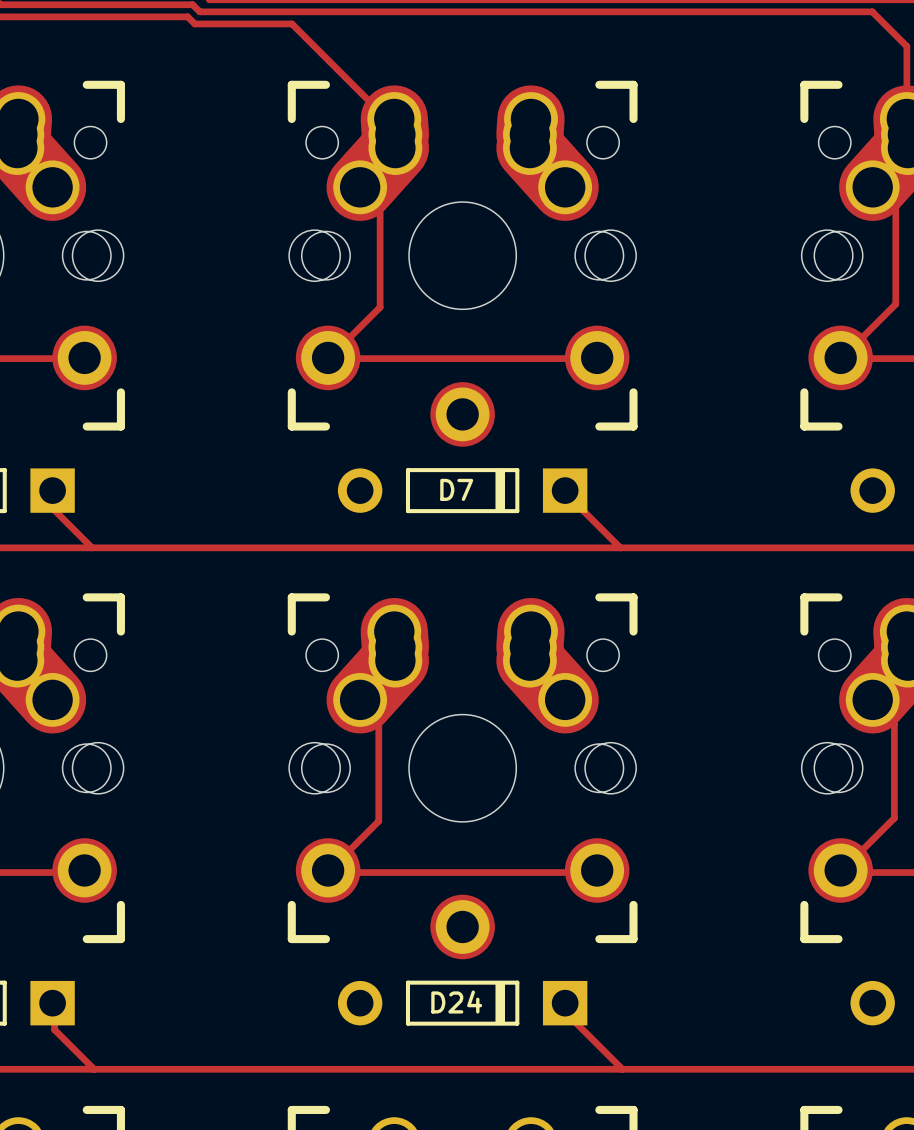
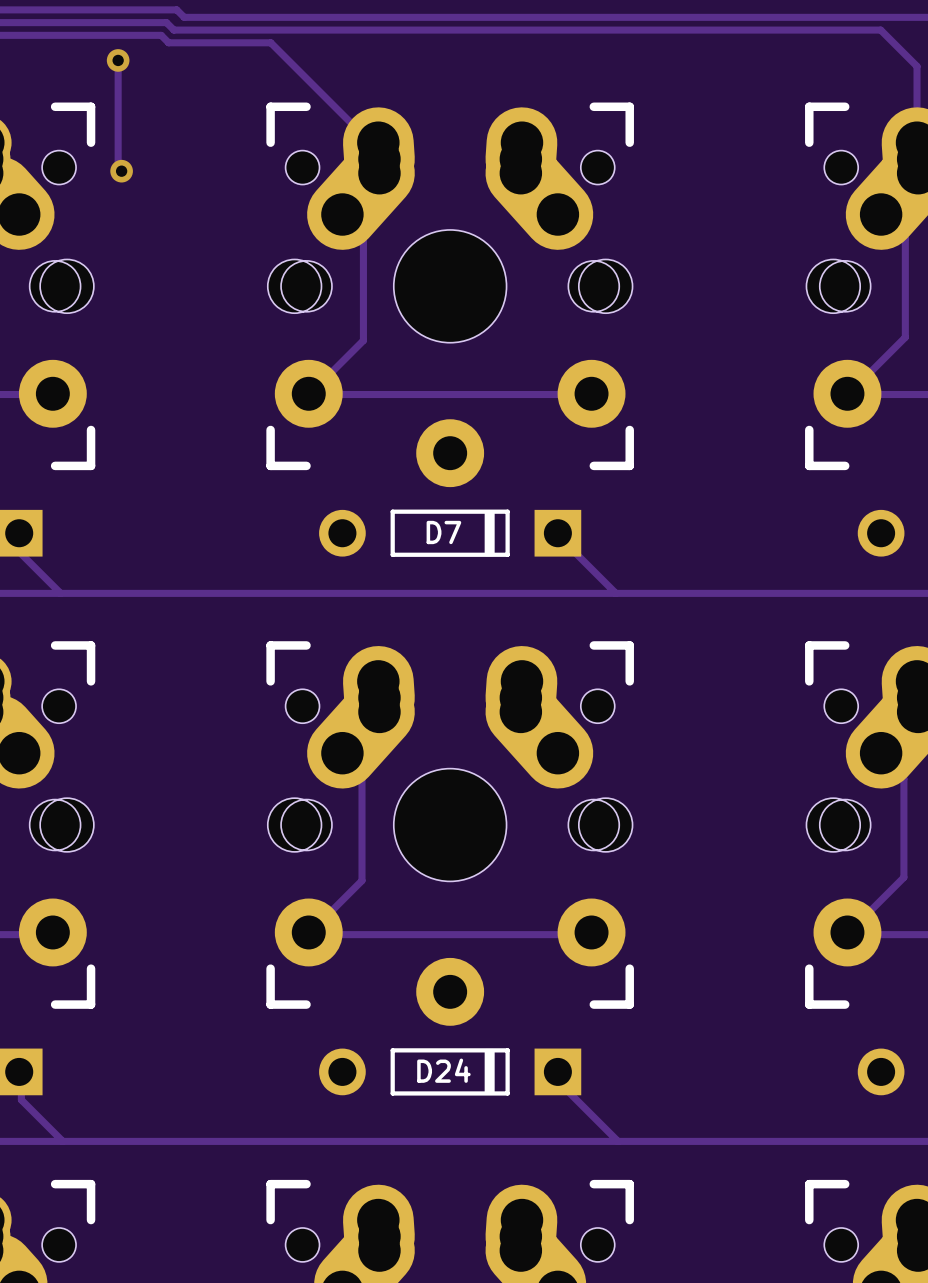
track: none -> (118, 60) (118, 167) (121, 171)
via: none -> (118, 60)
via: none -> (121, 171)

